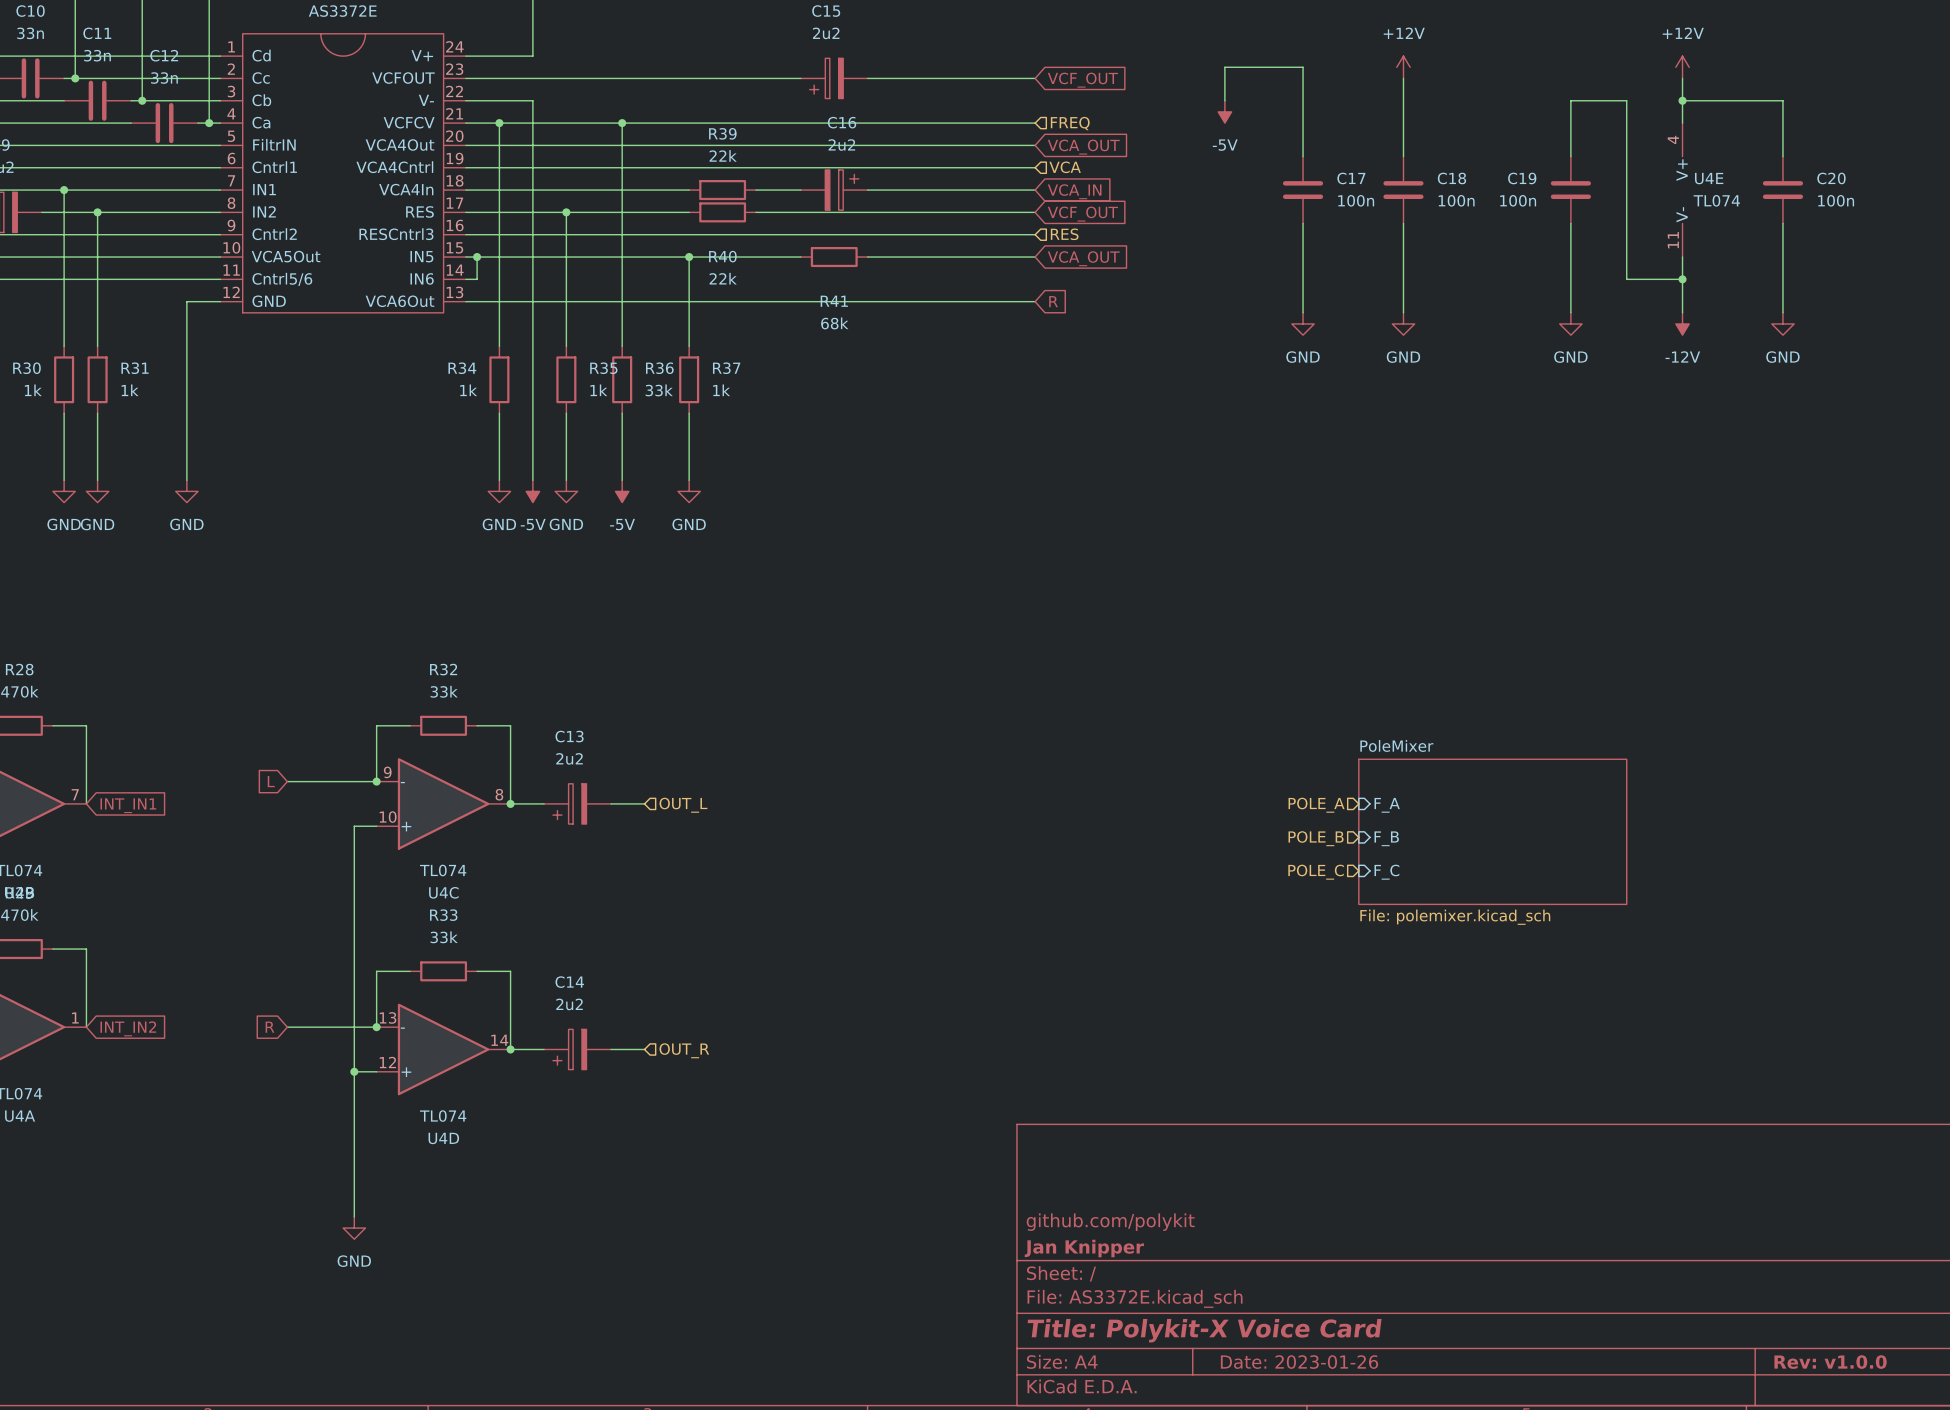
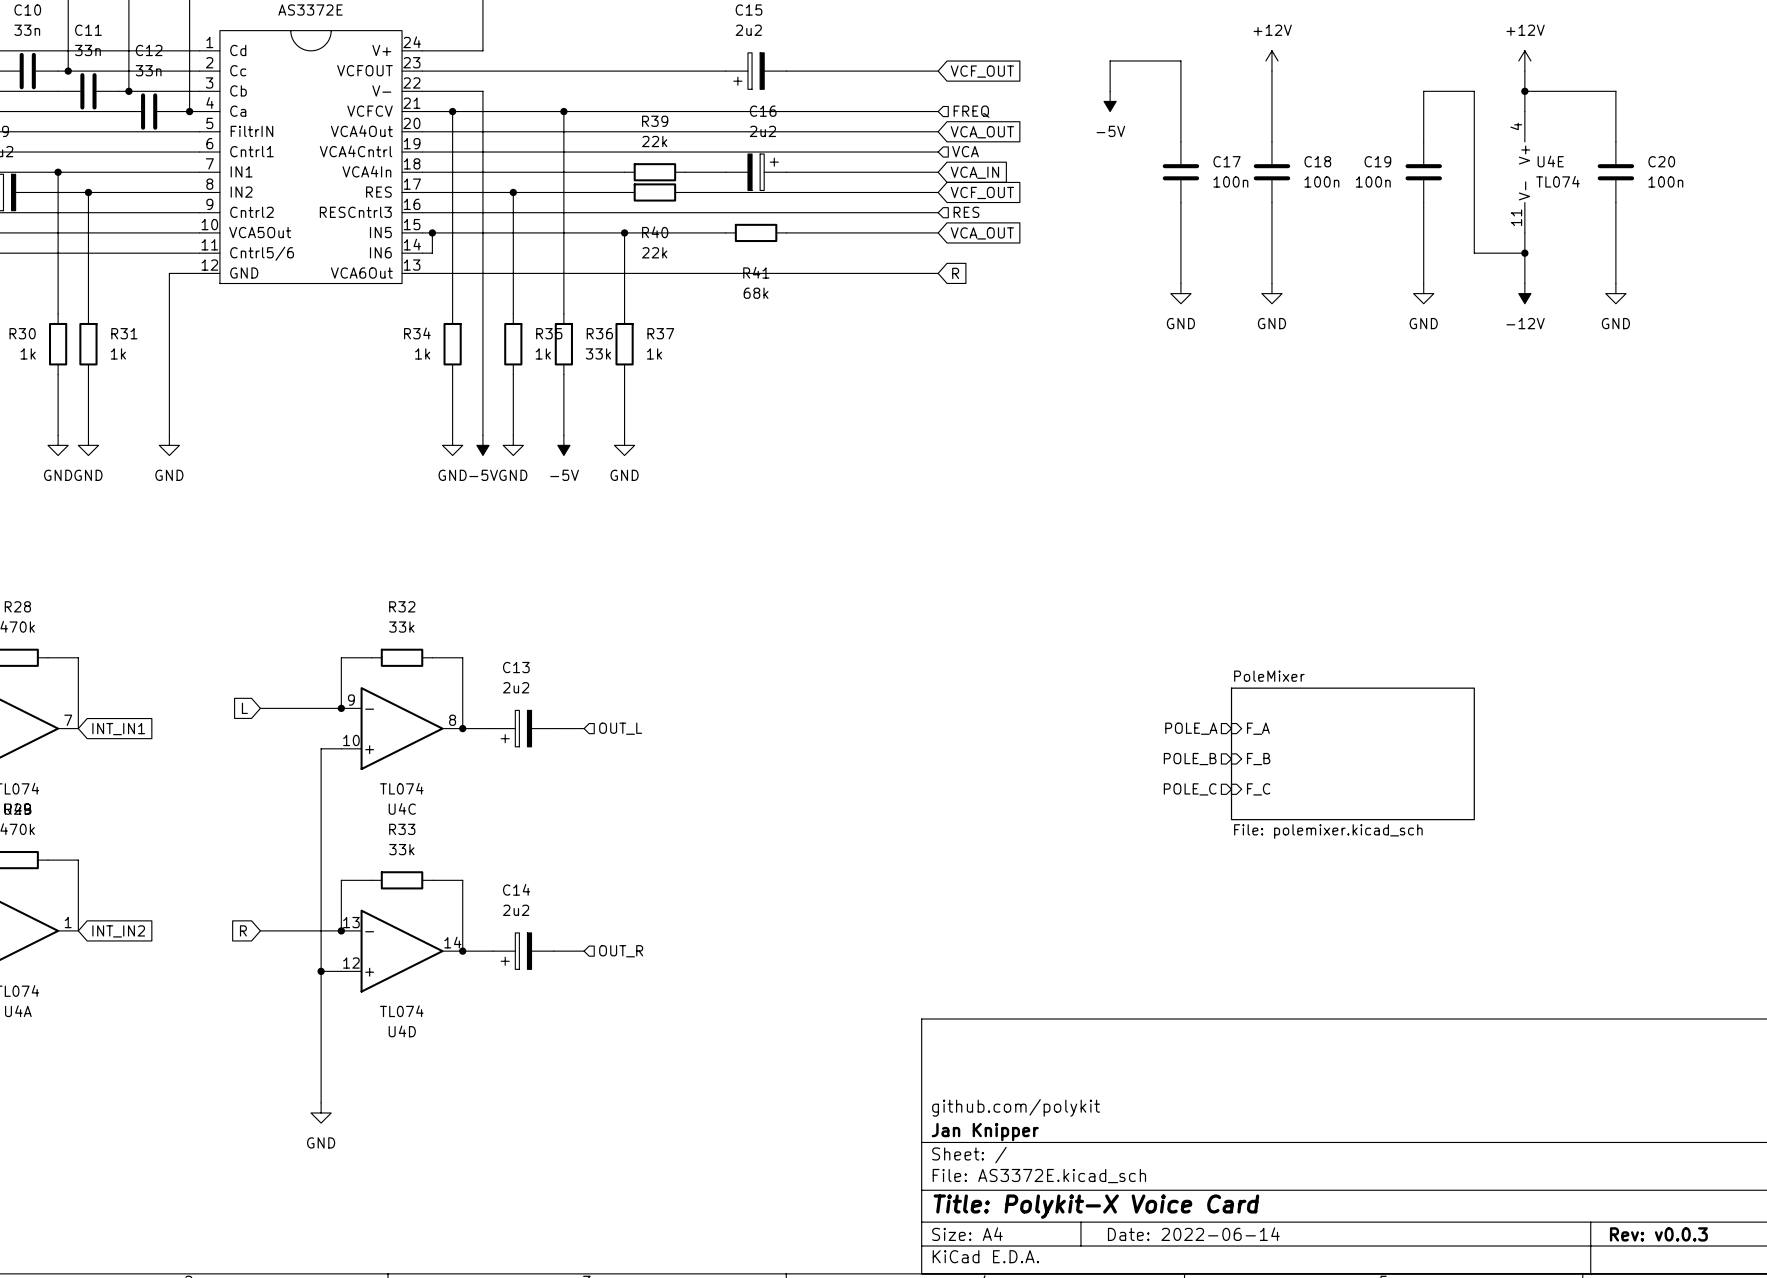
title block: Date: 2023-01-26 (1299, 1362) -> Date: 2022-06-14 (1193, 1234)
title block: Rev: v1.0.0 (1830, 1362) -> Rev: v0.0.3 (1658, 1234)

